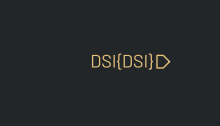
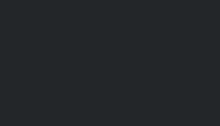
hierarchical label: DSI{DSI} (122, 61) -> none

